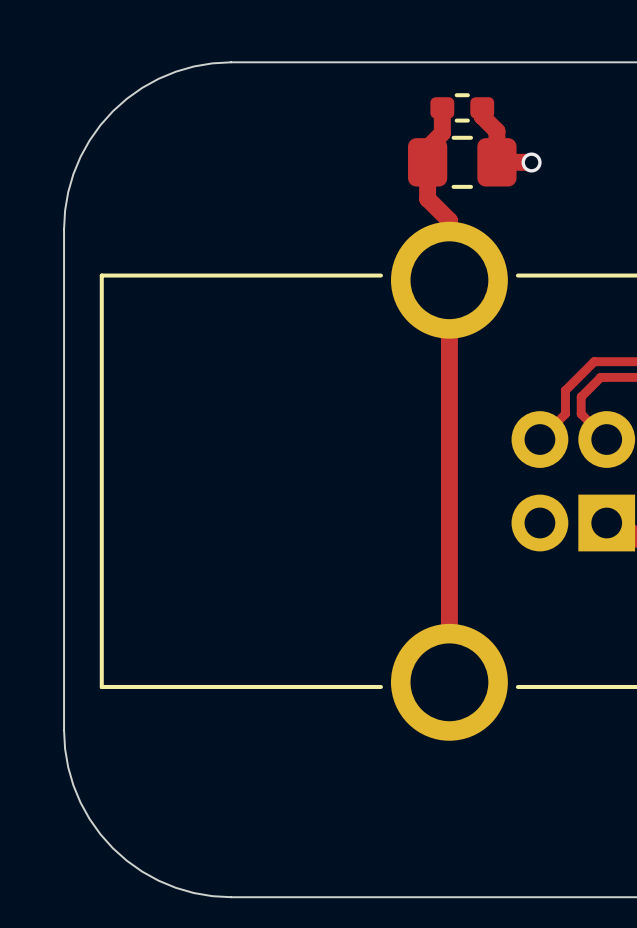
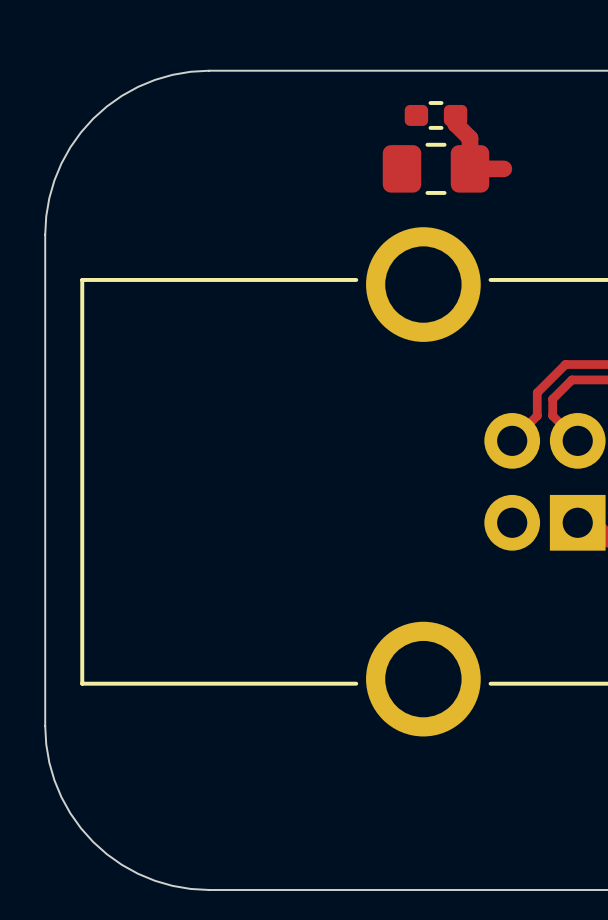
track: (442, 107) (442, 133) (427, 147) (427, 198) (449, 220) (449, 682) -> none
via: (531, 162) -> none

